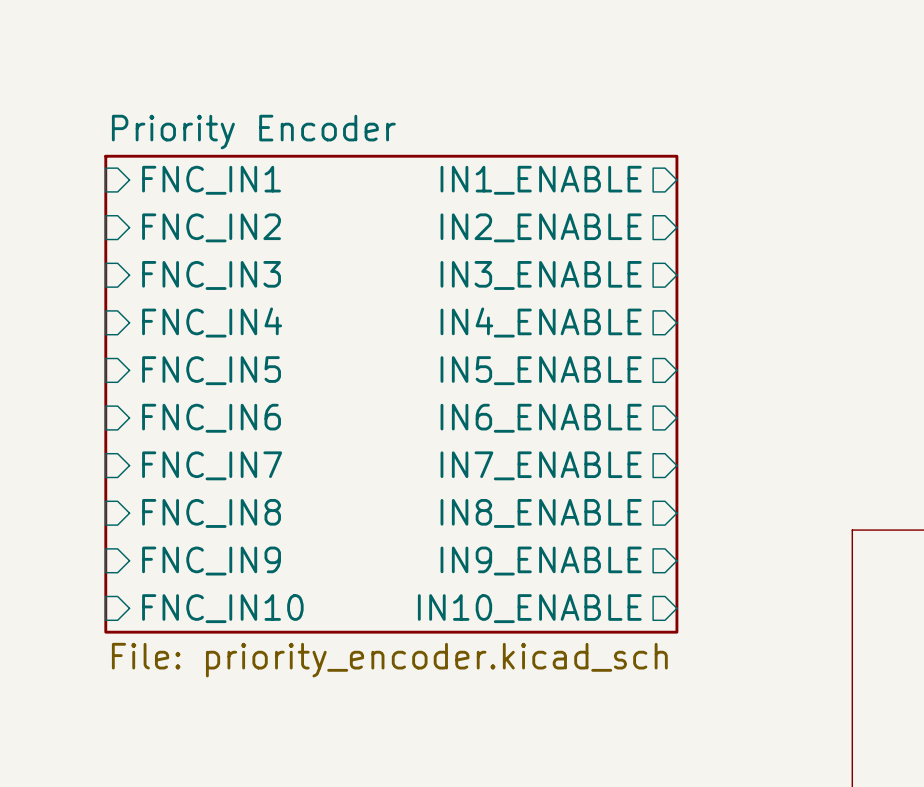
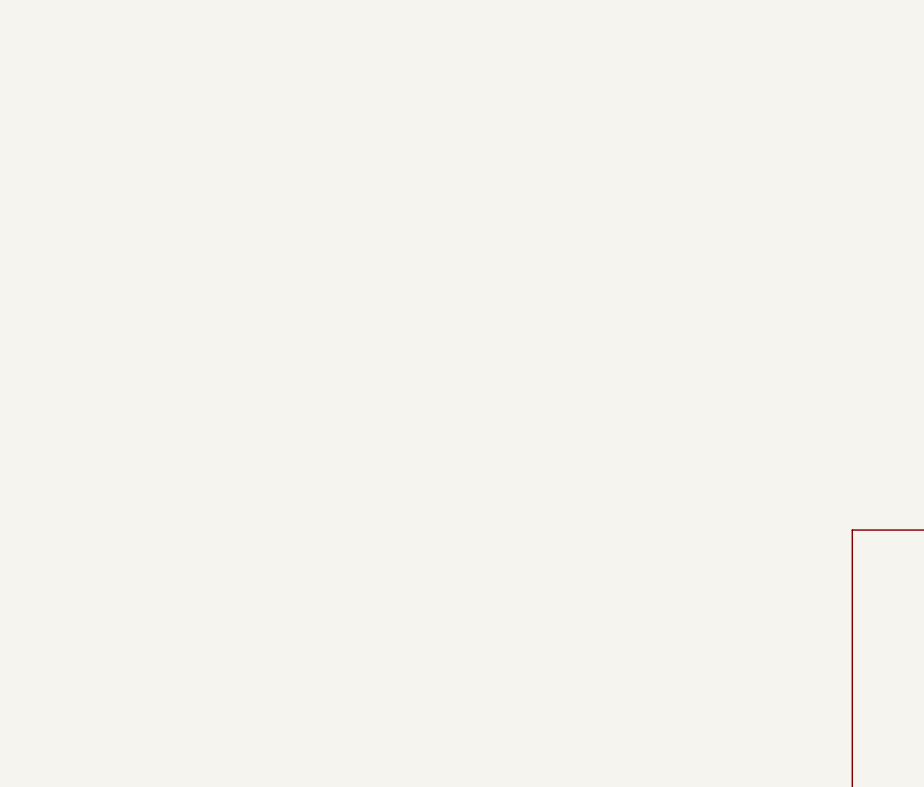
sheet pin: FNC_IN1 (211, 180) -> none
sheet pin: IN1_ENABLE (541, 180) -> none
sheet pin: FNC_IN2 (211, 227) -> none
sheet pin: IN2_ENABLE (541, 227) -> none
sheet pin: FNC_IN3 (211, 275) -> none
sheet pin: IN3_ENABLE (541, 275) -> none
sheet pin: FNC_IN4 (212, 322) -> none
sheet pin: IN4_ENABLE (541, 322) -> none
sheet pin: FNC_IN5 (211, 370) -> none
sheet pin: IN5_ENABLE (541, 370) -> none
sheet Priority Encoder: File: priority_encoder.kicad_sch (391, 394) -> none
sheet pin: FNC_IN6 (211, 418) -> none
sheet pin: IN6_ENABLE (541, 418) -> none
sheet pin: FNC_IN7 (212, 465) -> none
sheet pin: IN7_ENABLE (541, 465) -> none
sheet pin: FNC_IN8 (211, 513) -> none
sheet pin: IN8_ENABLE (541, 513) -> none
sheet pin: FNC_IN9 (211, 561) -> none
sheet pin: IN9_ENABLE (541, 561) -> none
sheet pin: FNC_IN10 (222, 608) -> none
sheet pin: IN10_ENABLE (529, 608) -> none

